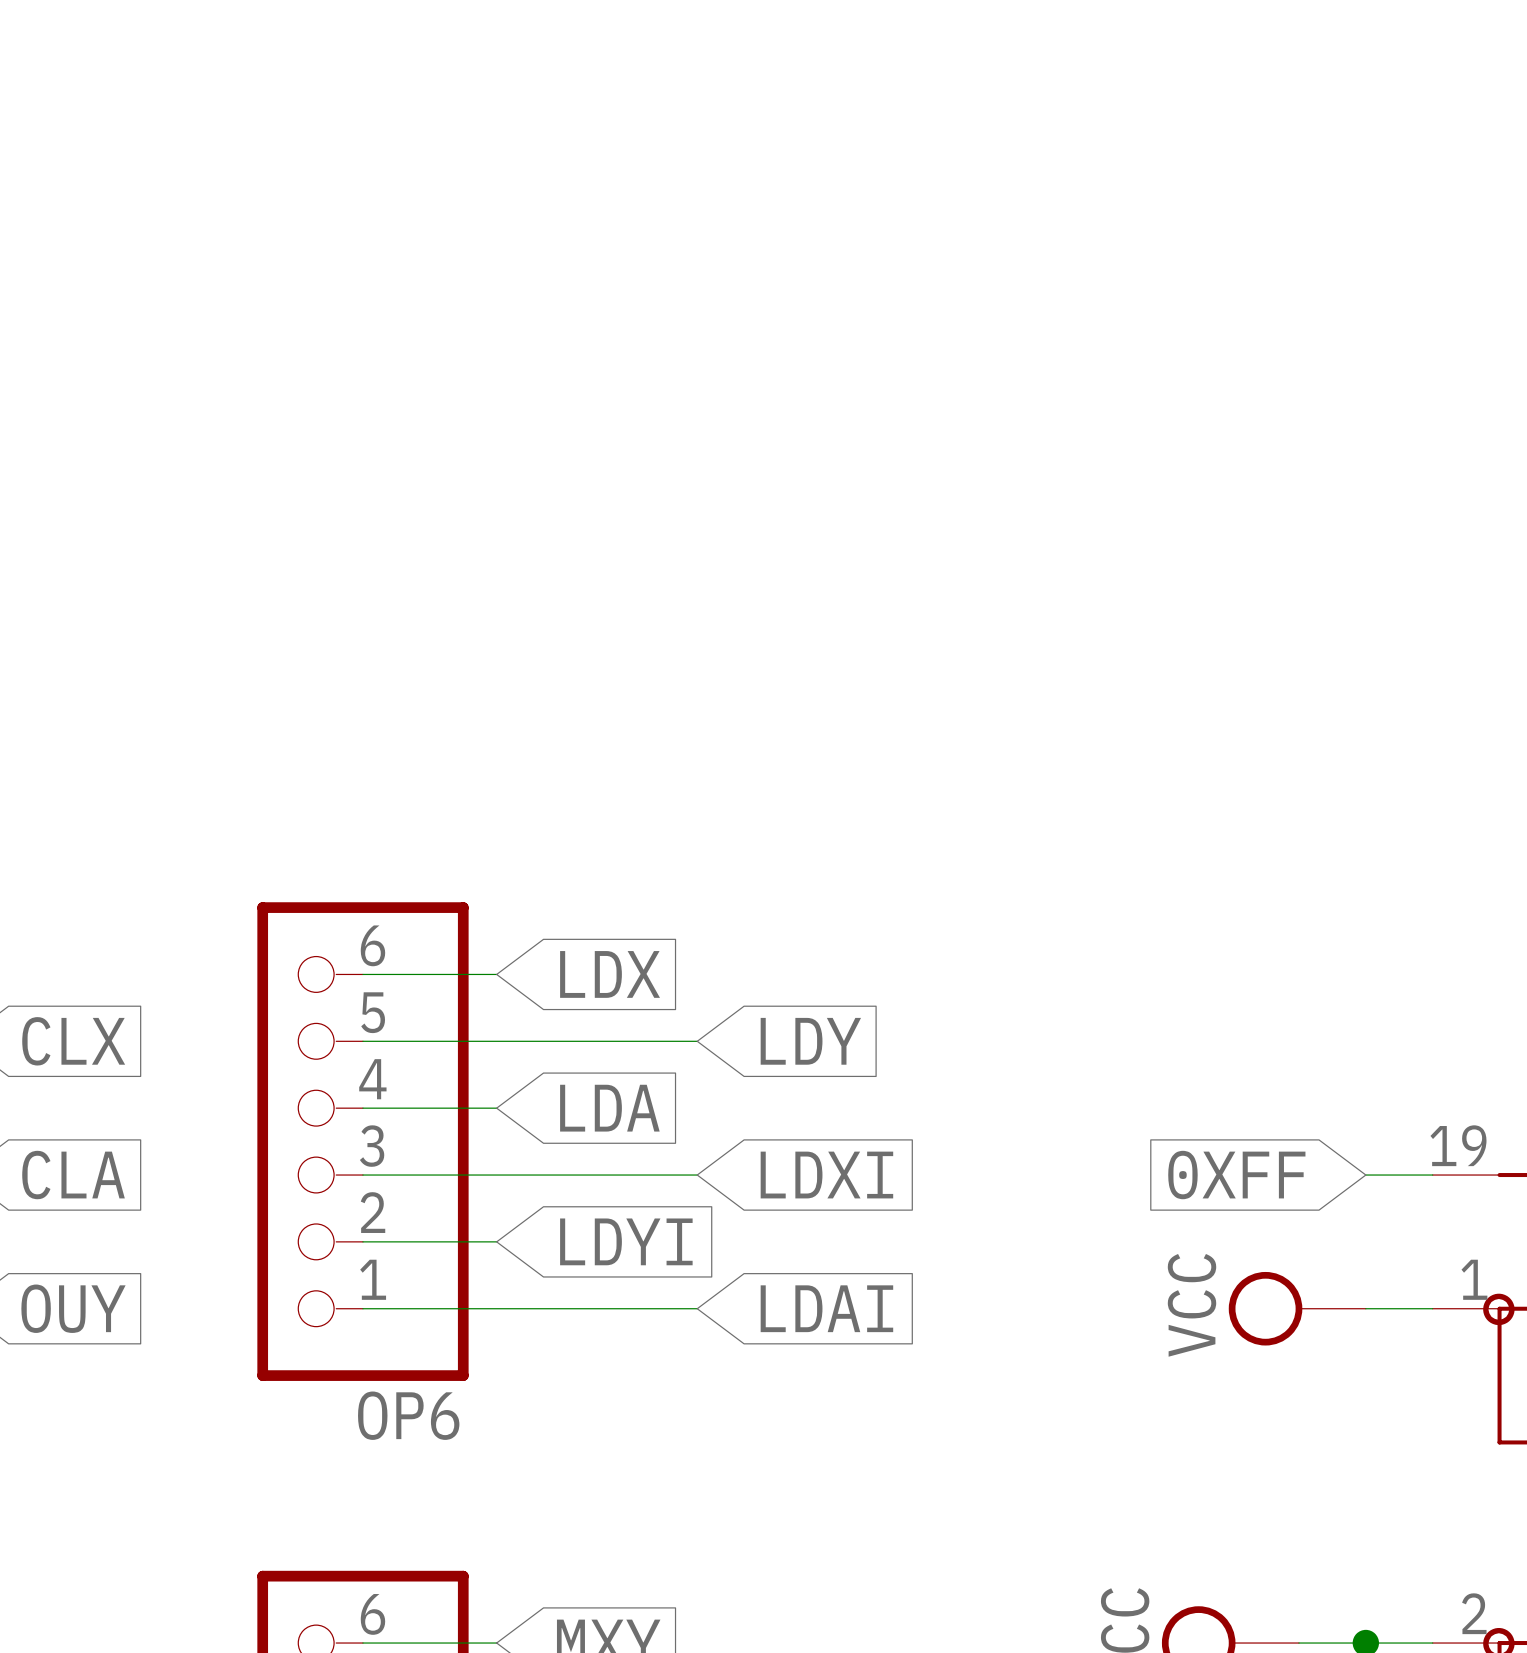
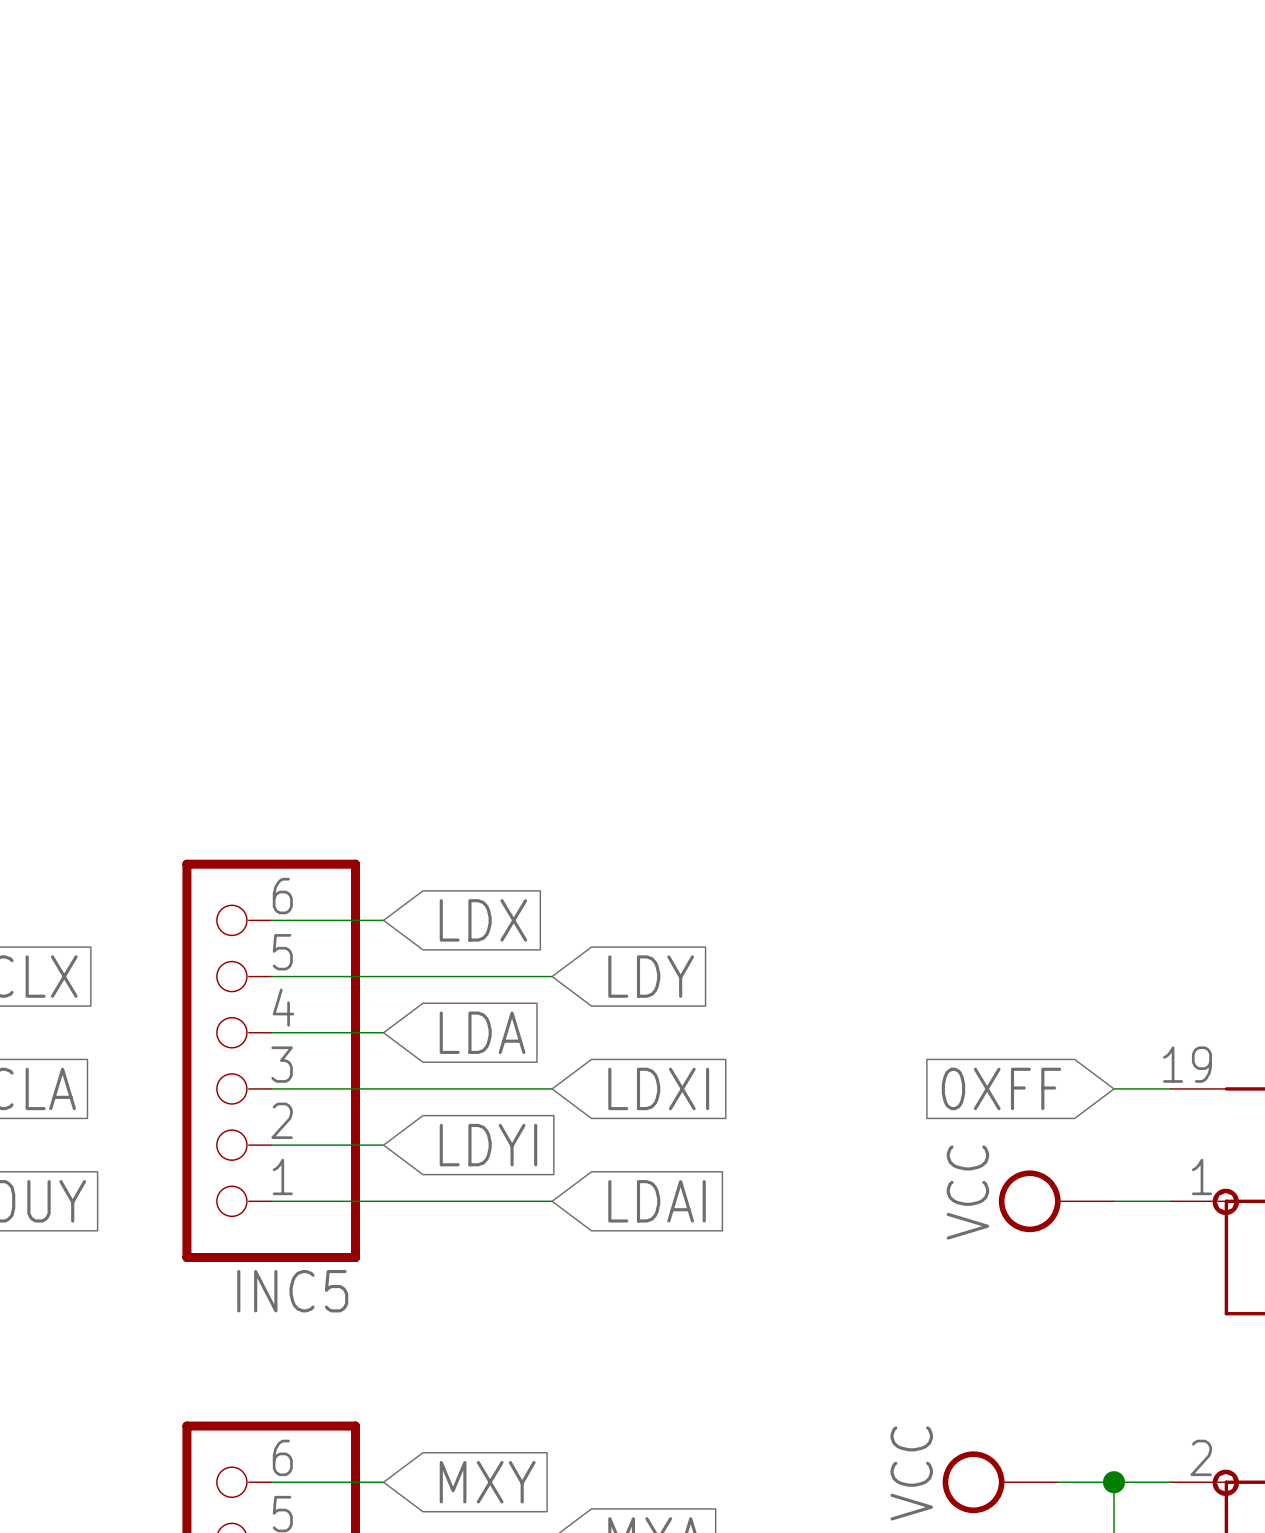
OP6 name: OP6 (408, 1415) -> INC5 (292, 1291)

